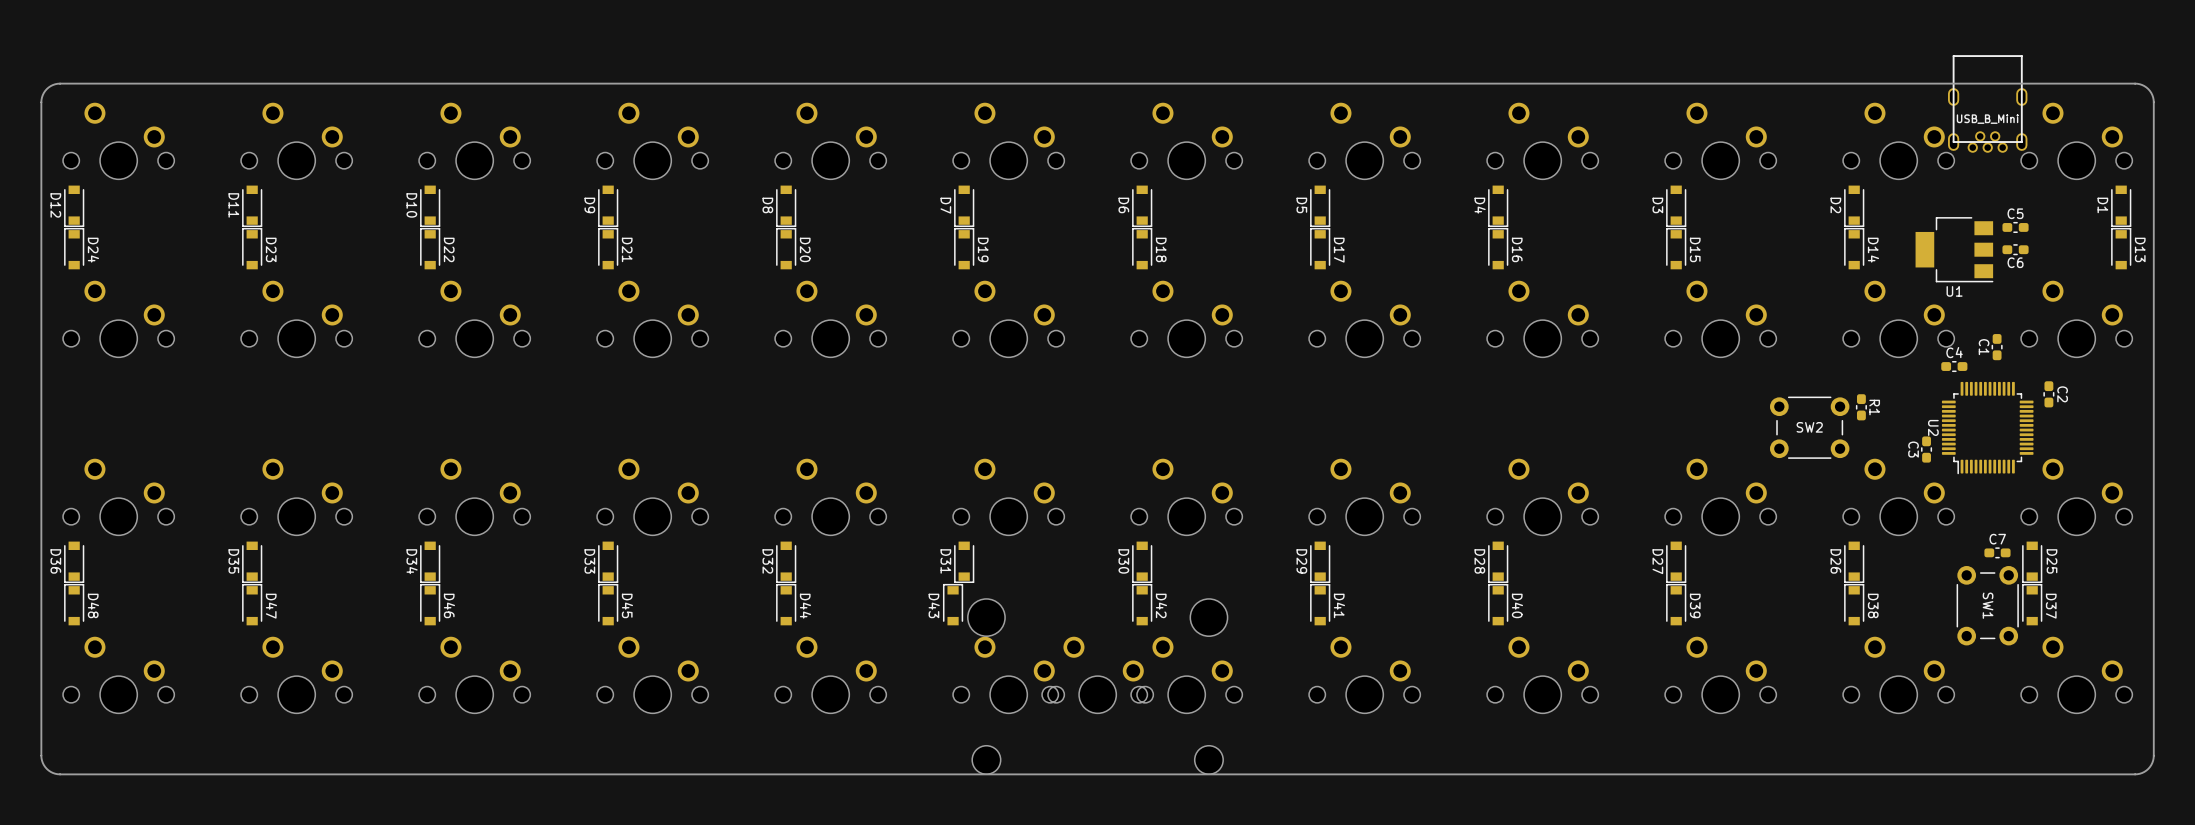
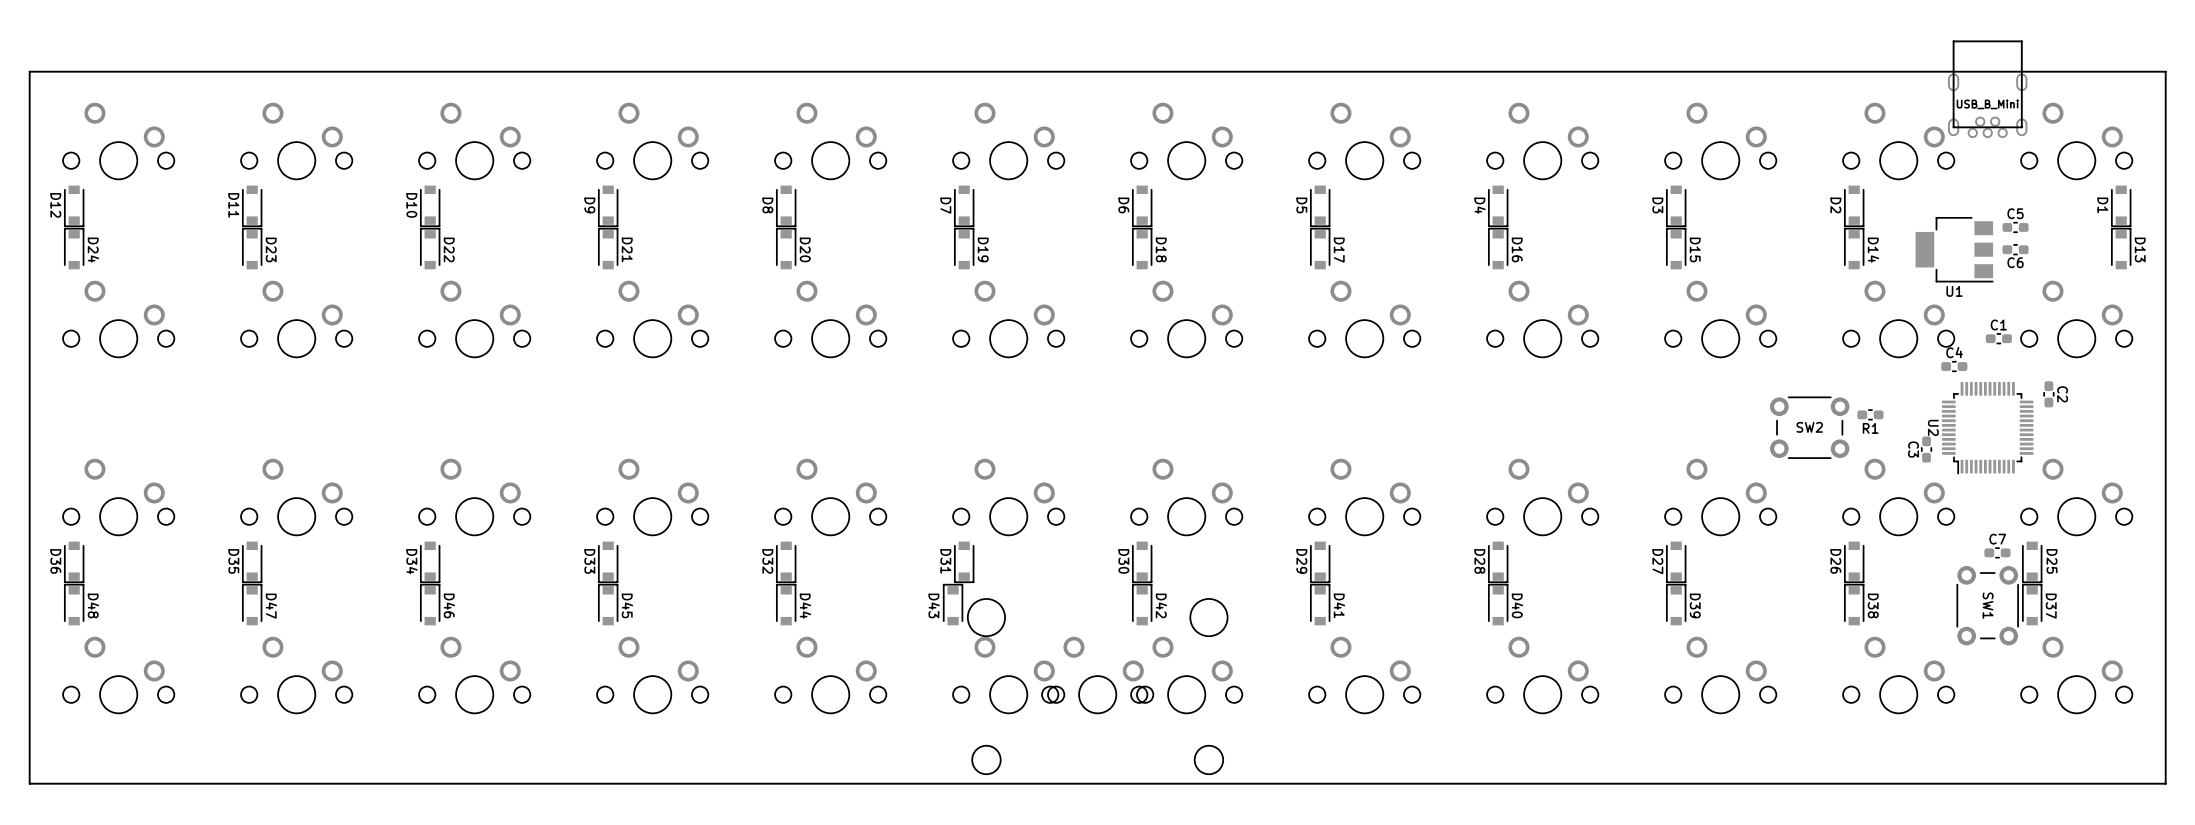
board edge: (2135, 83) (55, 84) (45, 90) (41, 102) (41, 760) (48, 770) (60, 774) (2139, 773) (2149, 767) (2153, 755) (2153, 102) (2148, 89) (2135, 83) -> (2165, 71) (2165, 783) (29, 783) (29, 71) (2165, 71)
part position: (1987, 103) -> (1987, 89)
C1 rotation: 0° (1997, 347) -> 90° clockwise (1998, 338)
R1 rotation: 0° (1861, 407) -> 90° clockwise (1870, 414)

